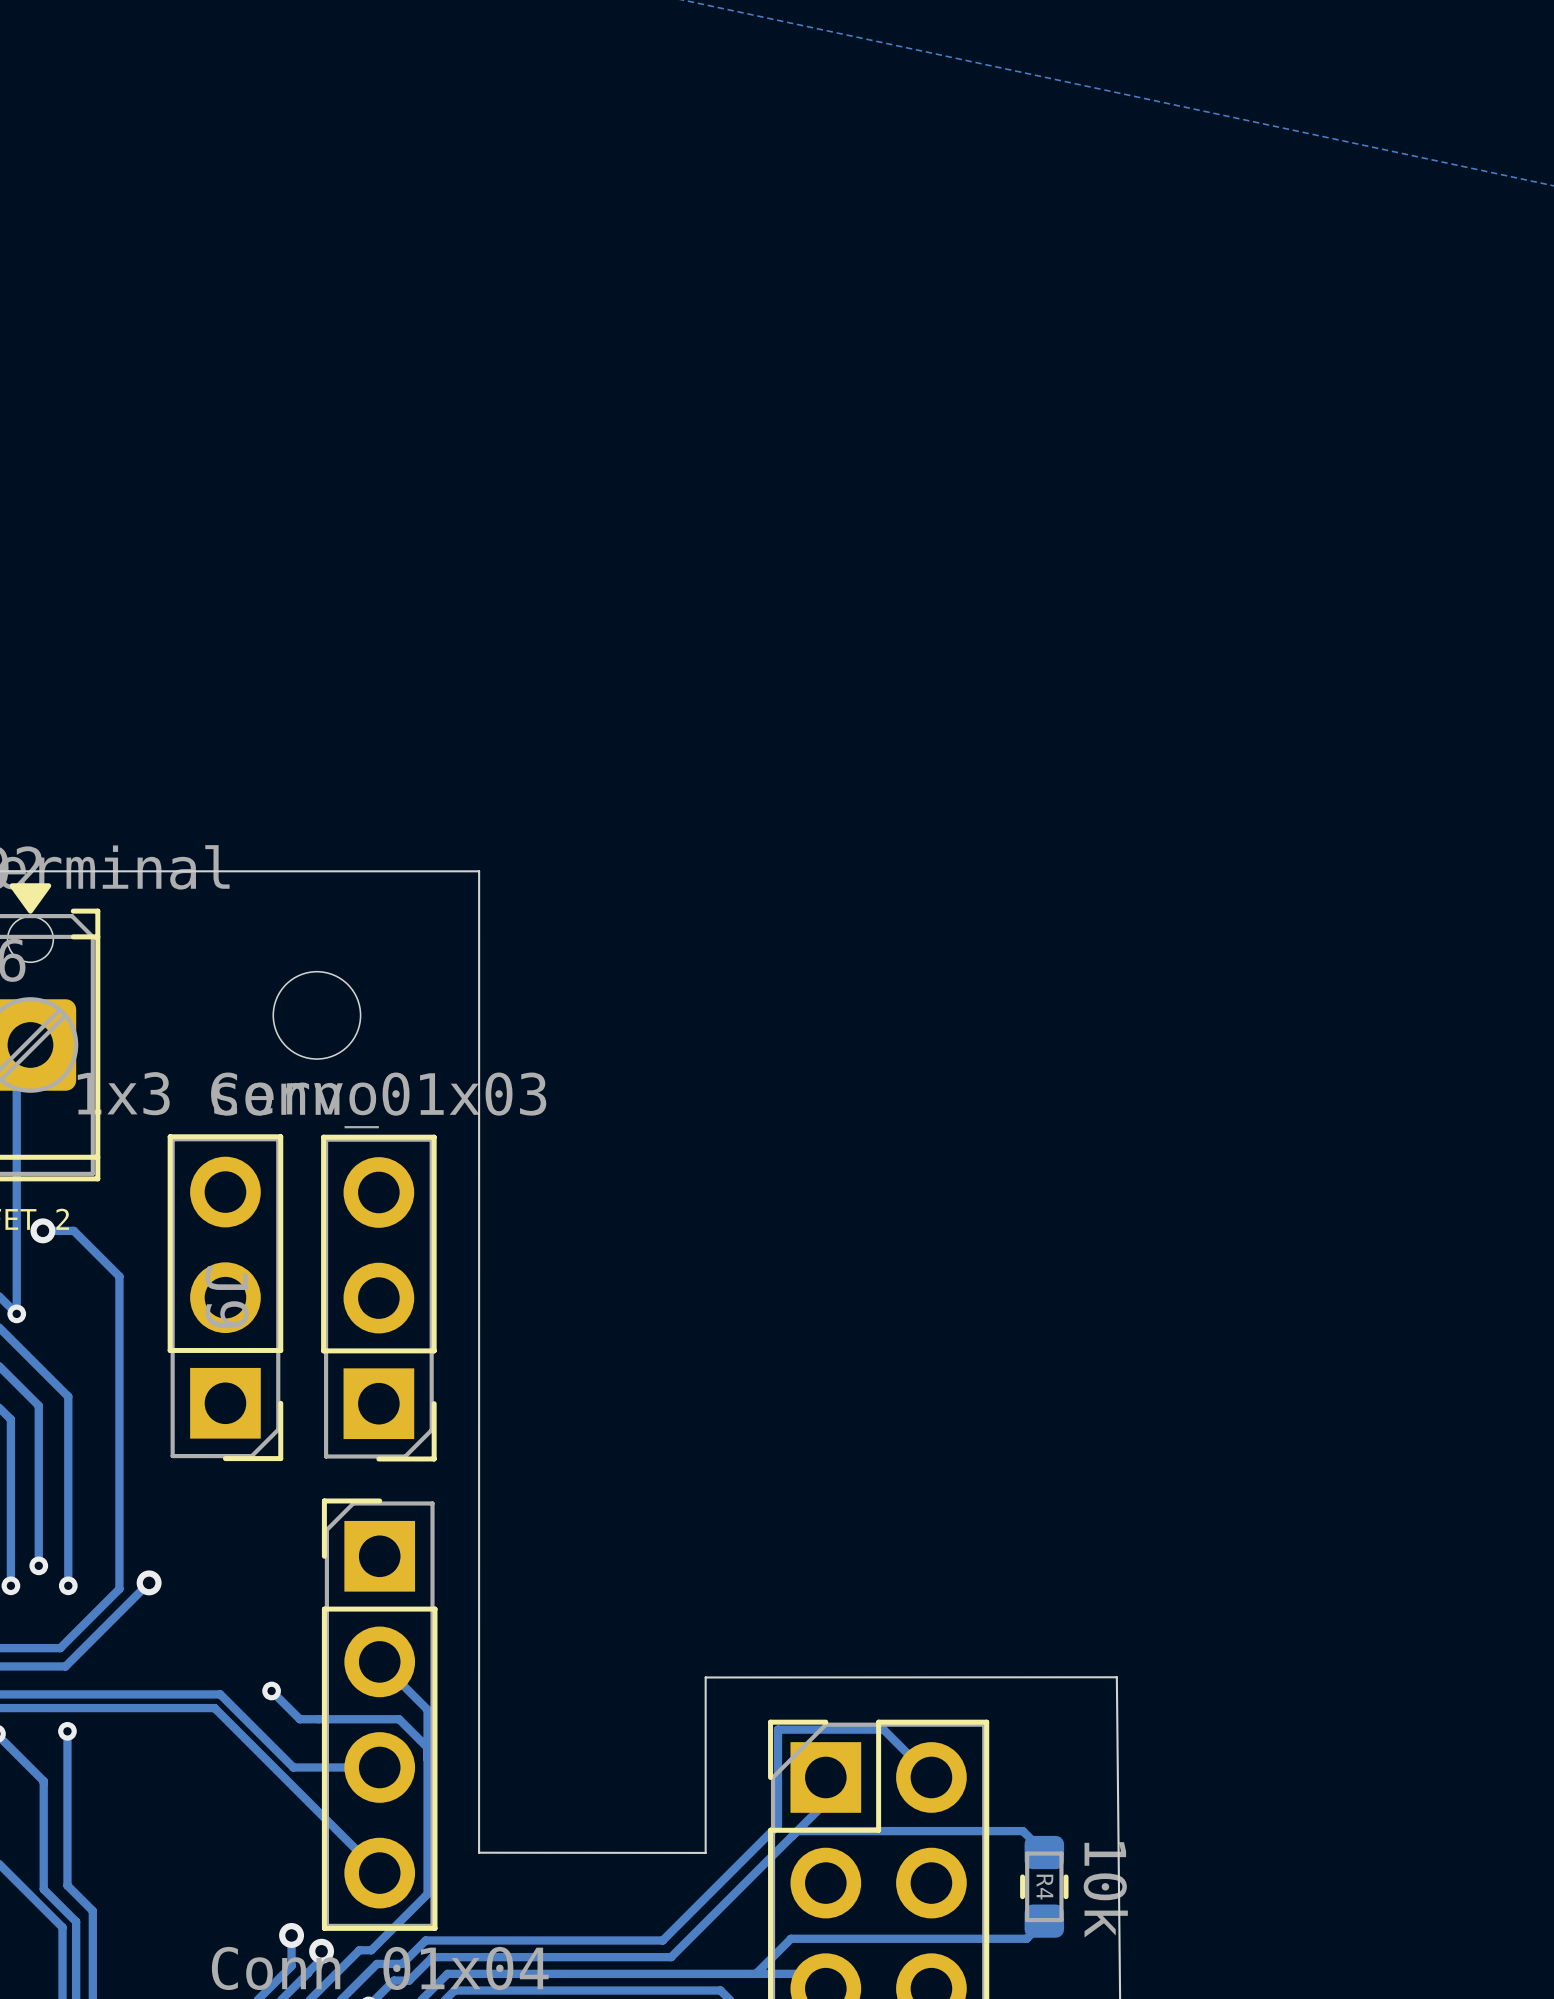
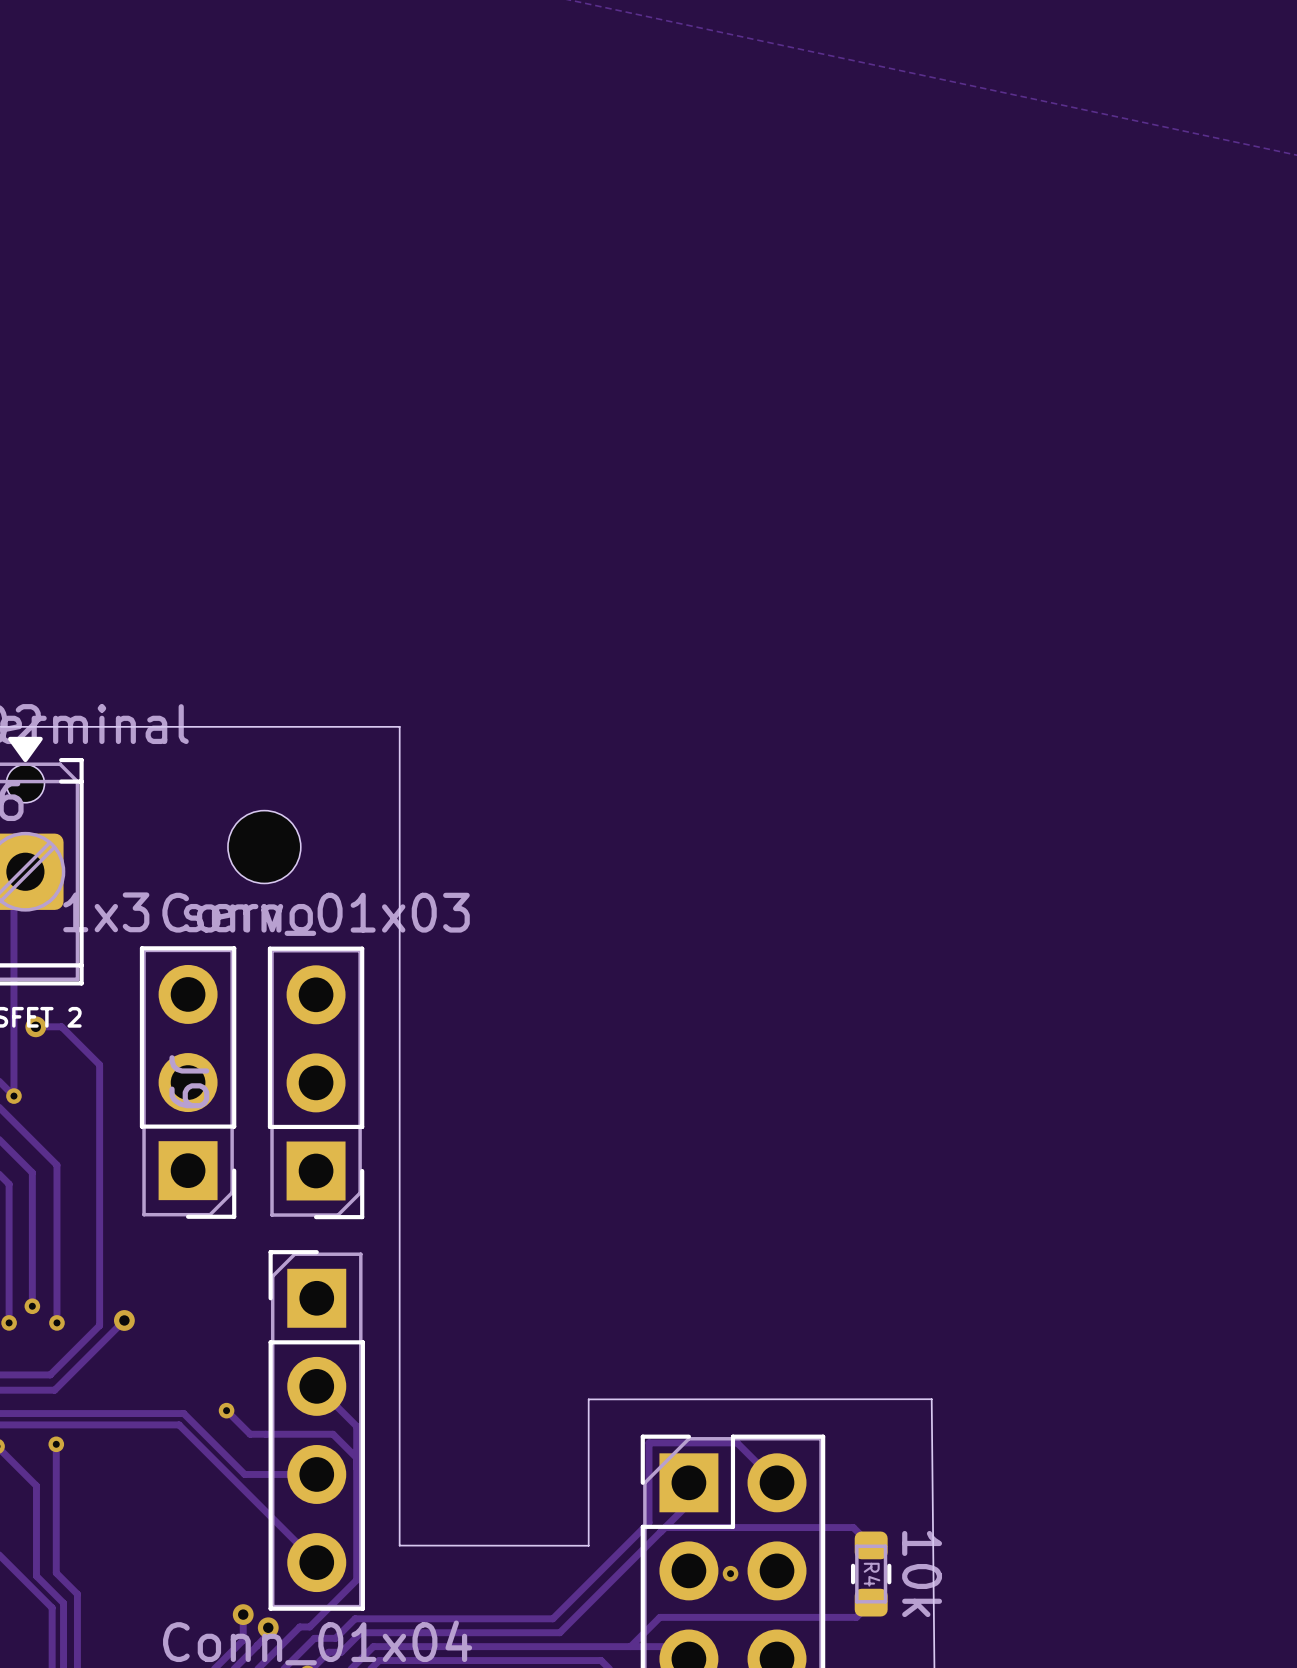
via: none -> (730, 1573)

